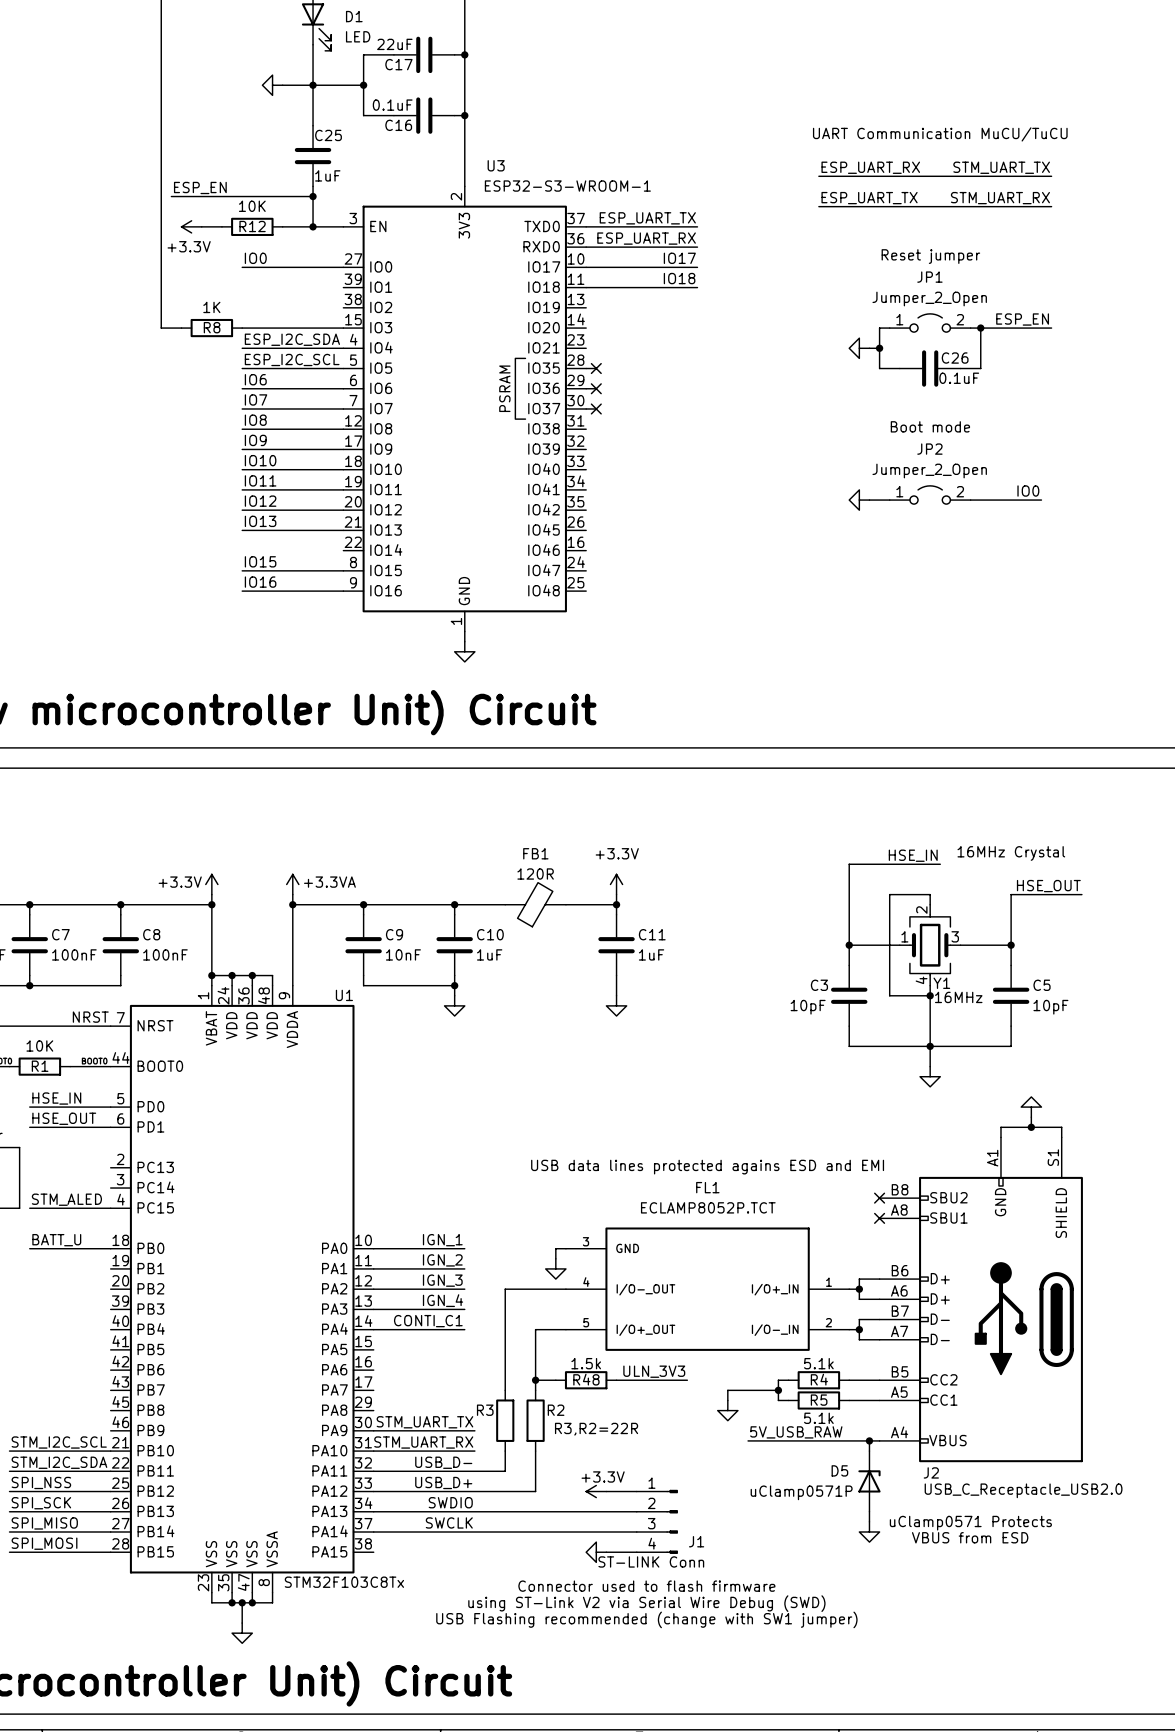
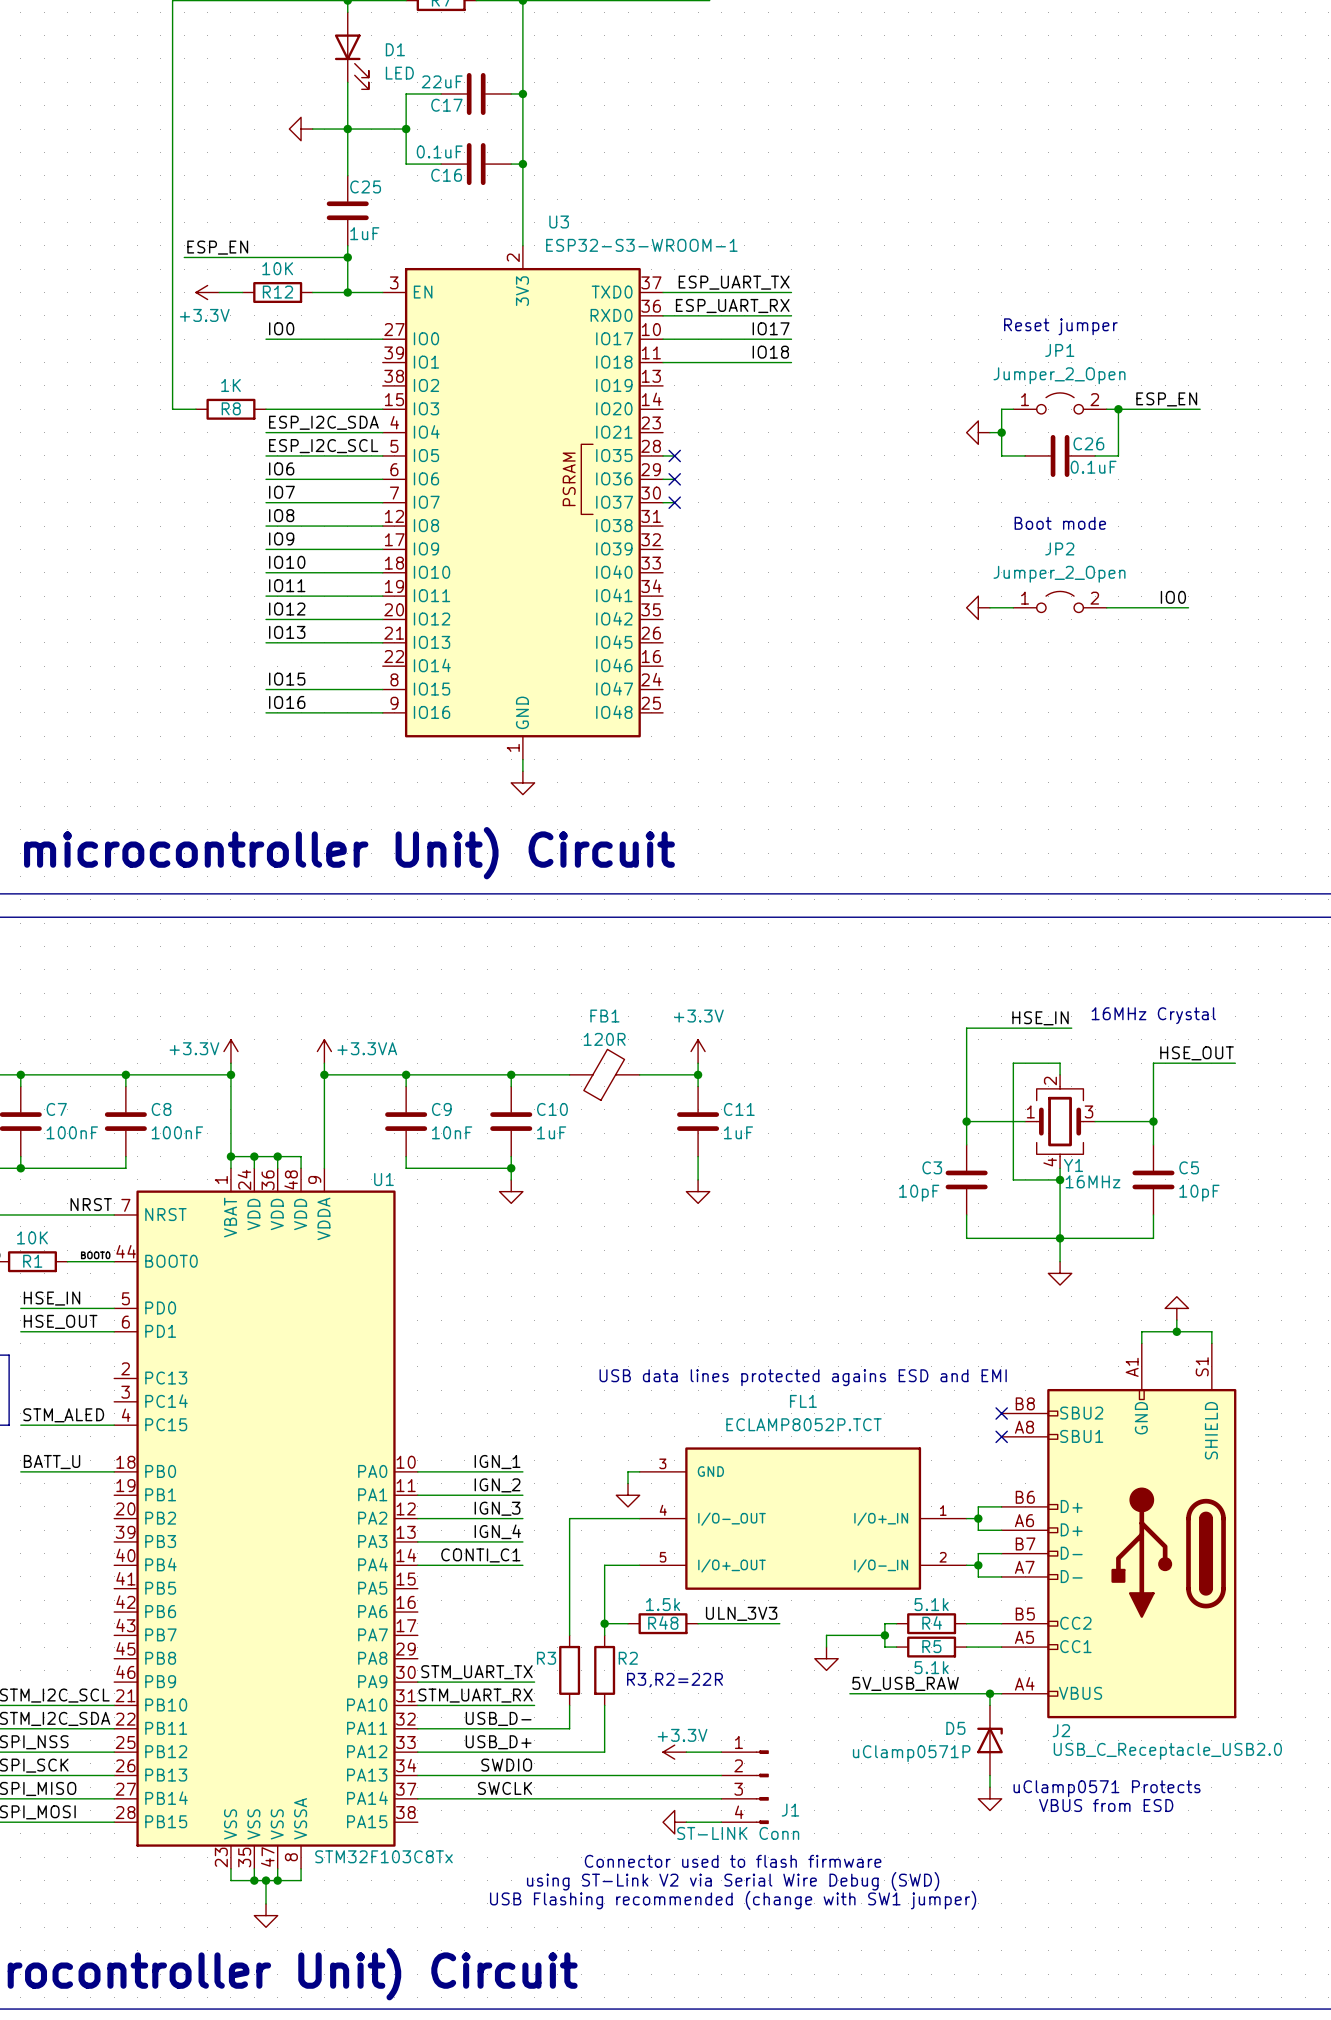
text: UART Communication MuCU/TuCU (940, 134) -> none
label: ESP_UART_RX (870, 167) -> none
label: STM_UART_TX (1001, 167) -> none
wire: (818, 176) (1051, 176) -> none
label: ESP_UART_TX (869, 198) -> none
label: STM_UART_RX (1000, 198) -> none
wire: (818, 206) (1051, 206) -> none

